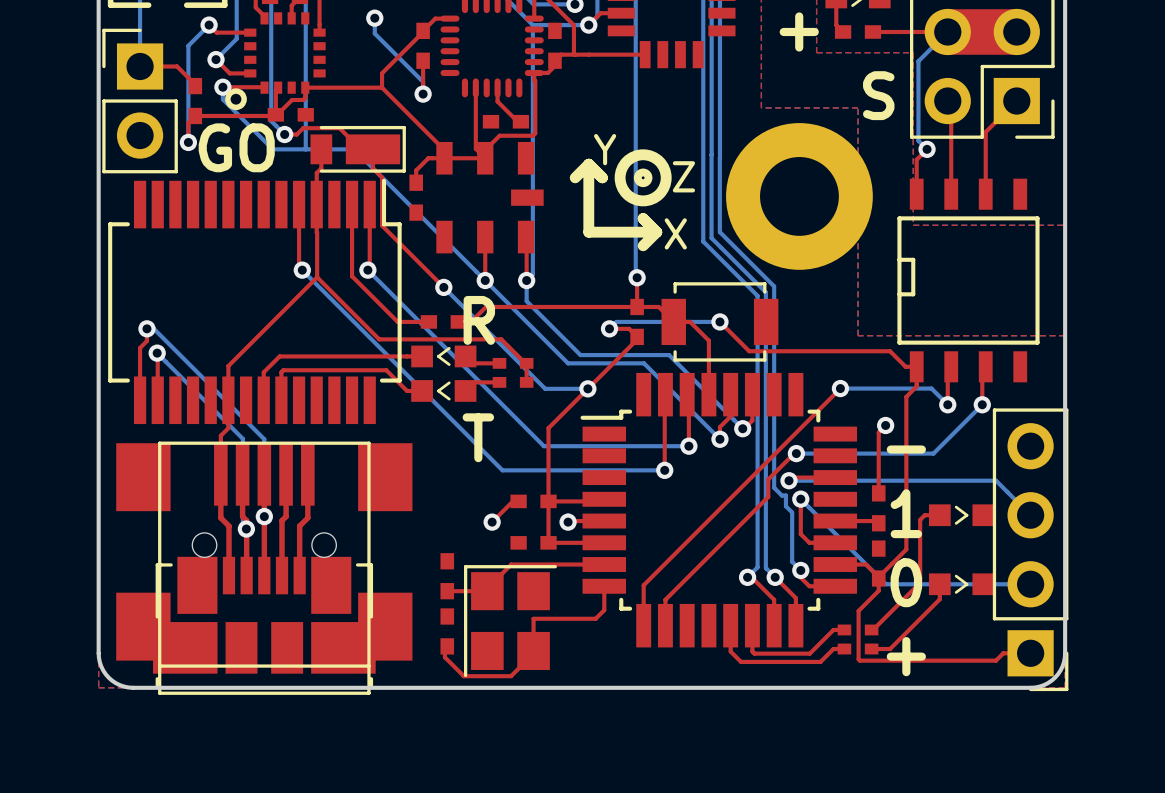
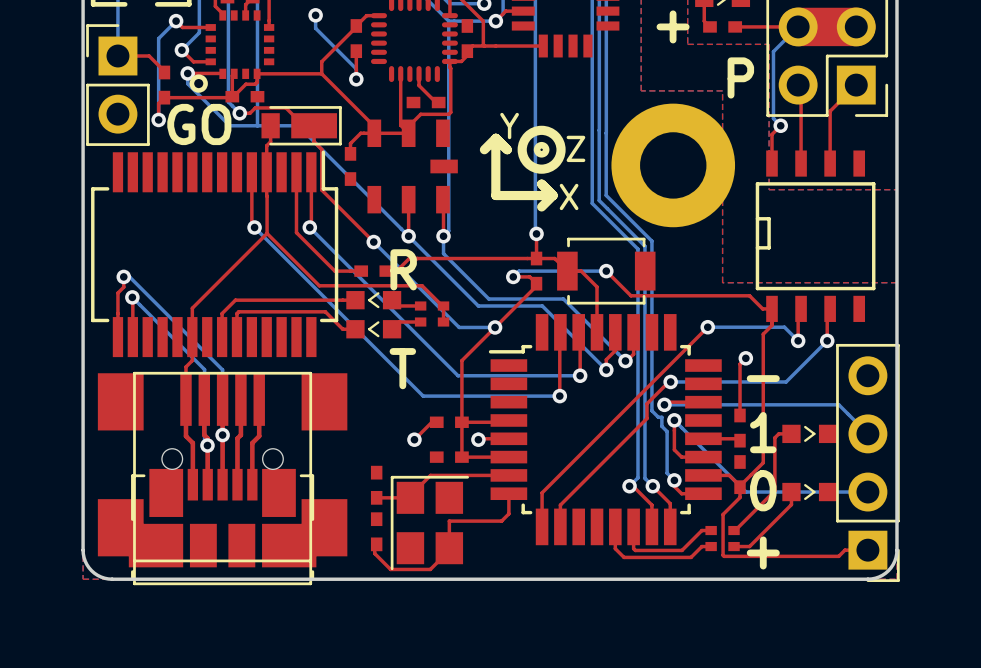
text: S (878, 95) -> P (740, 77)

